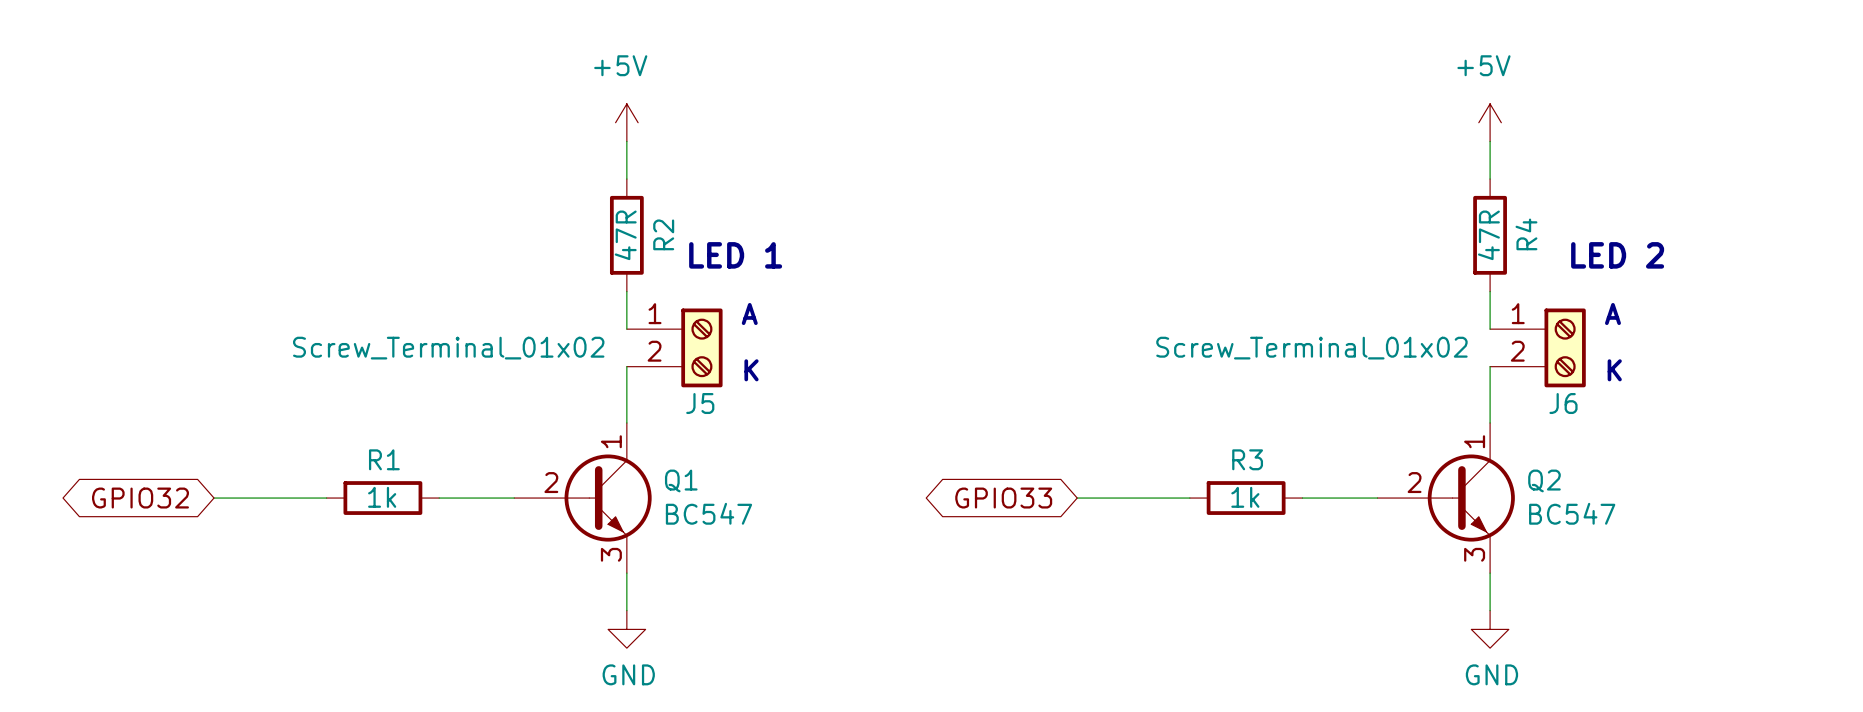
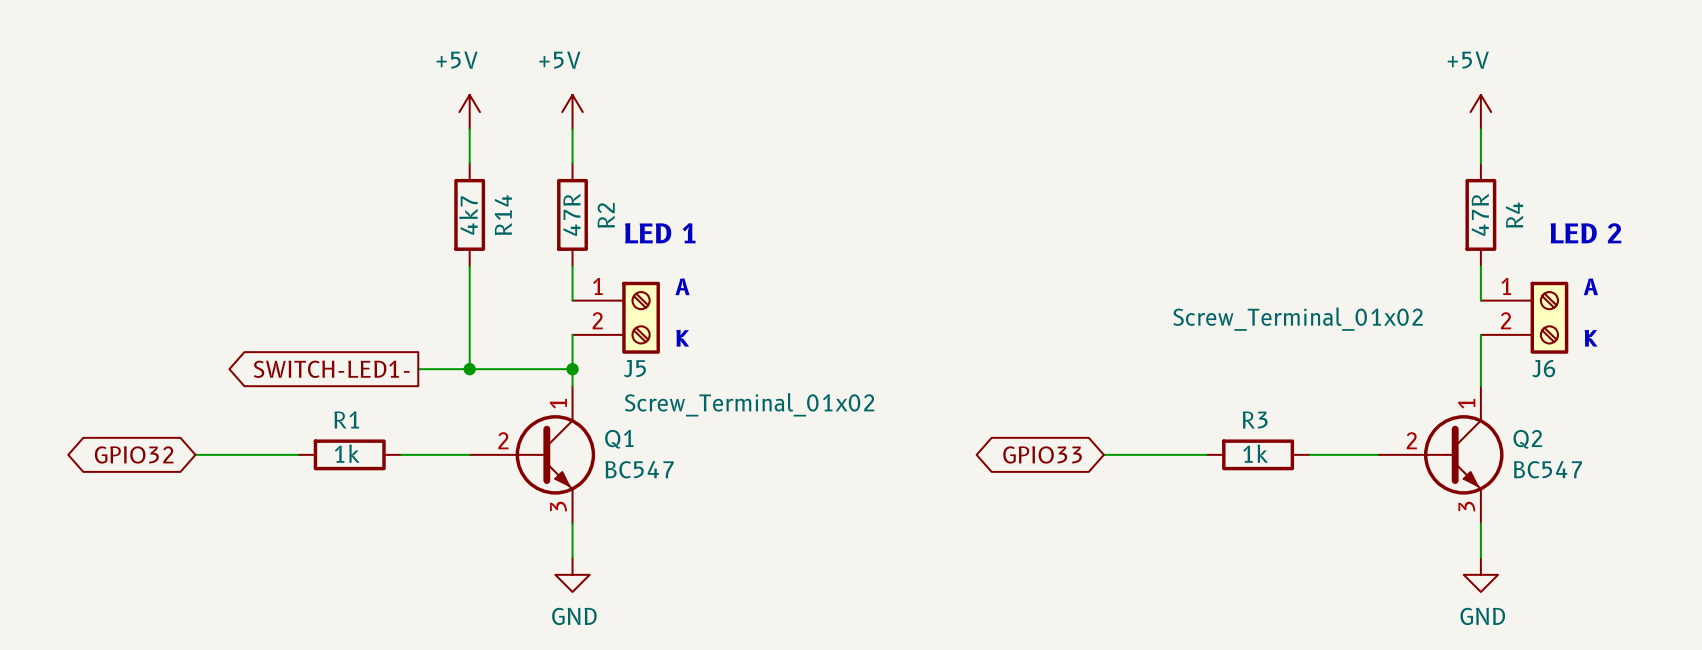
power symbol: none -> +5V (469, 112)
power symbol position: +5V (1490, 122) -> +5V (1480, 112)
wire: none -> (469, 129) (469, 163)
wire: (1490, 141) (1490, 179) -> (1480, 129) (1480, 163)
R14: none -> 4k7 (469, 214)
R4 position: (1490, 235) -> (1480, 214)
text position: LED 2 (1617, 255) -> LED 2 (1585, 233)
wire: none -> (469, 266) (469, 369)
wire: (1490, 291) (1490, 329) -> (1480, 266) (1480, 300)
text position: A (1612, 314) -> A (1590, 286)
J6 position: (1537, 347) -> (1524, 317)
J5 value position: Screw_Terminal_01x02 (448, 348) -> Screw_Terminal_01x02 (749, 404)
wire: (1490, 366) (1490, 422) -> (1480, 334) (1480, 386)
text position: K (1614, 370) -> K (1591, 338)
global label: none -> SWITCH-LED1- (331, 369)
wire: none -> (418, 369) (572, 369)
junction: none -> (469, 369)
junction: none -> (572, 369)
global label position: GPIO33 (1003, 498) -> GPIO33 (1042, 454)
wire: (1077, 498) (1189, 498) -> none
wire: none -> (1103, 454) (1189, 454)
R3 position: (1246, 498) -> (1258, 454)
wire: (1321, 498) (1377, 498) -> none
wire: none -> (1309, 454) (1378, 454)
Q2 position: (1446, 498) -> (1440, 454)
wire: (1490, 573) (1490, 610) -> (1480, 523) (1480, 557)
power symbol position: GND (1490, 629) -> GND (1480, 574)

